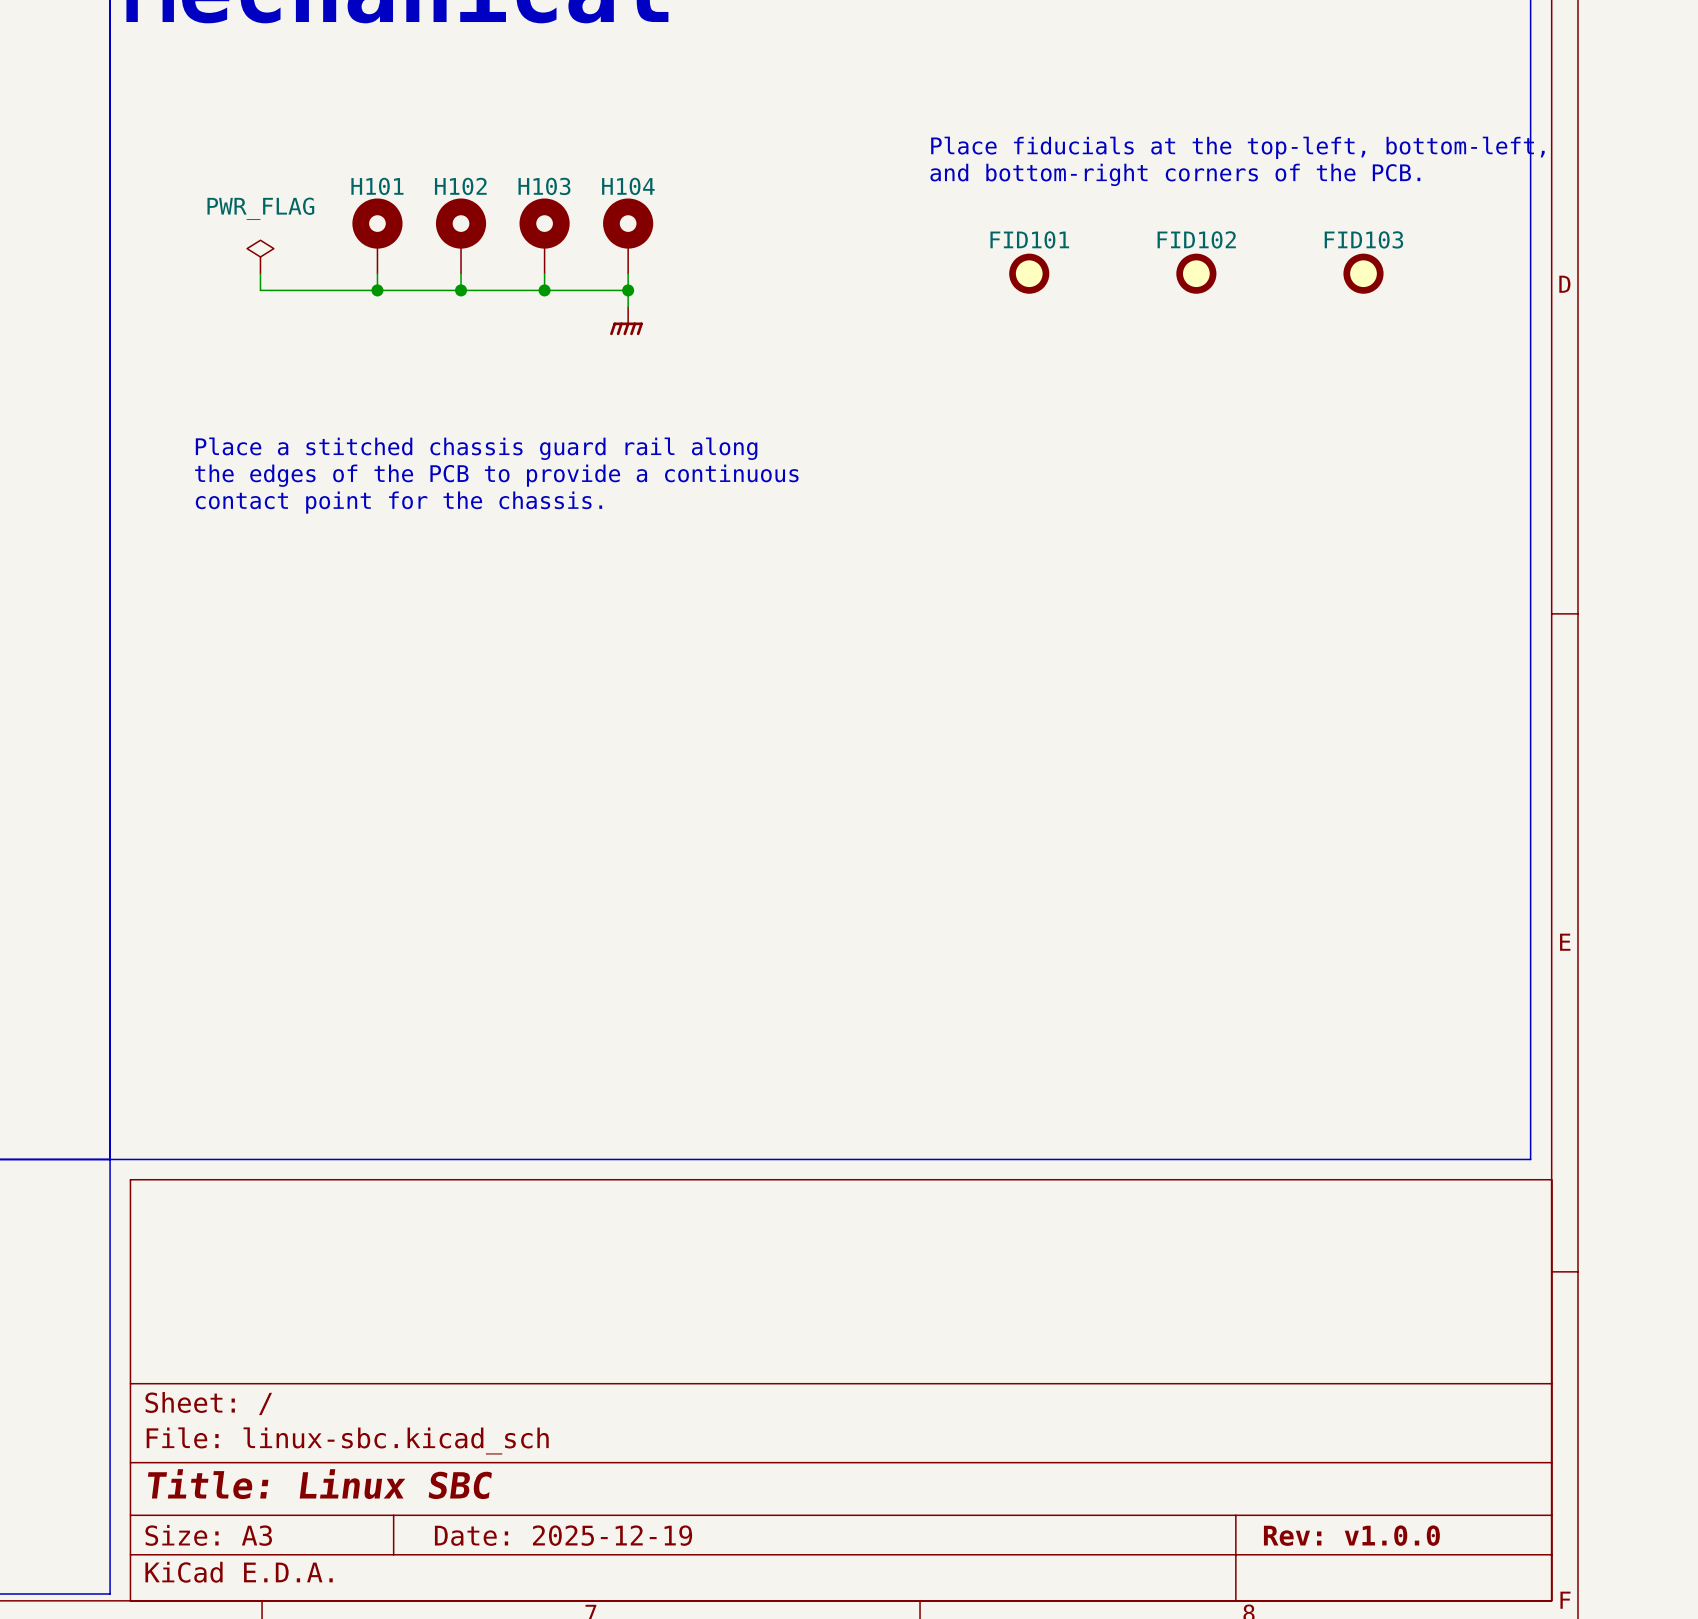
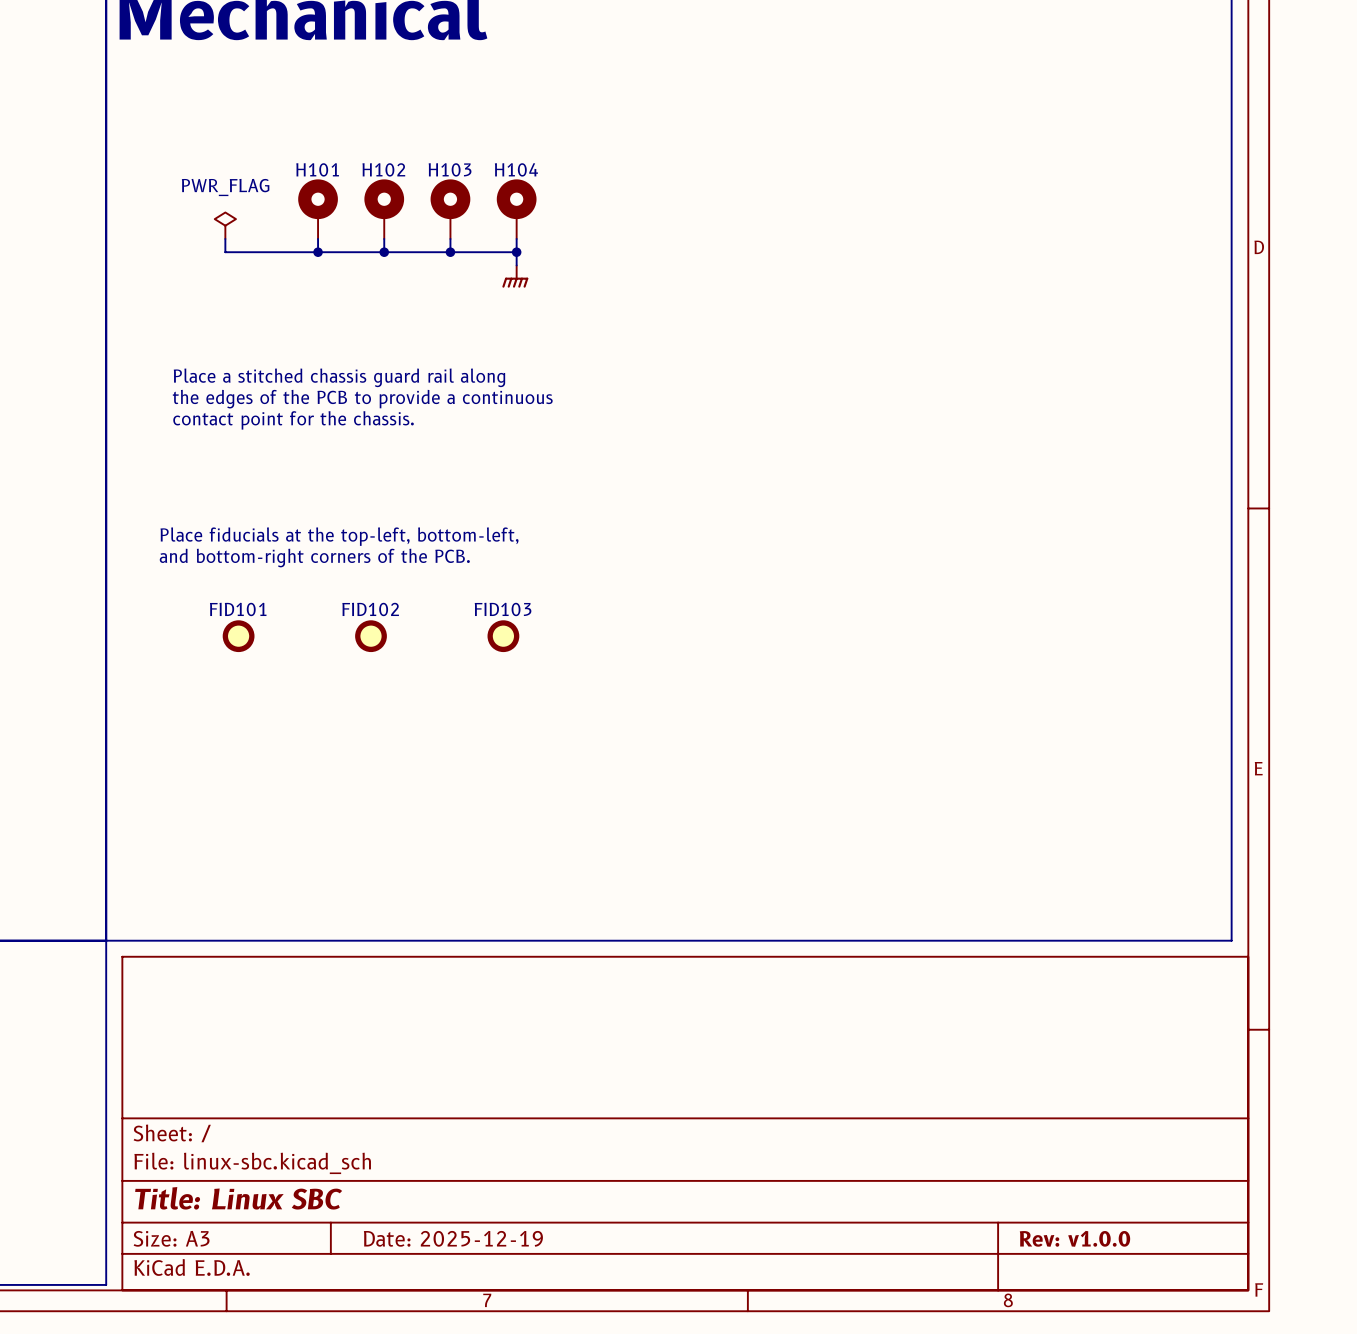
text: Place fiducials at the top-left, bottom-left, (1237, 147) -> none
text: and bottom-right corners of the PCB. (1175, 174) -> none
FID101 position: (1029, 273) -> (238, 636)
FID102 position: (1196, 273) -> (371, 636)
FID103 position: (1363, 273) -> (503, 636)
text: none -> Place fiducials at the top-left, bottom-left, (339, 536)
text: none -> and bottom-right corners of the PCB. (314, 558)

